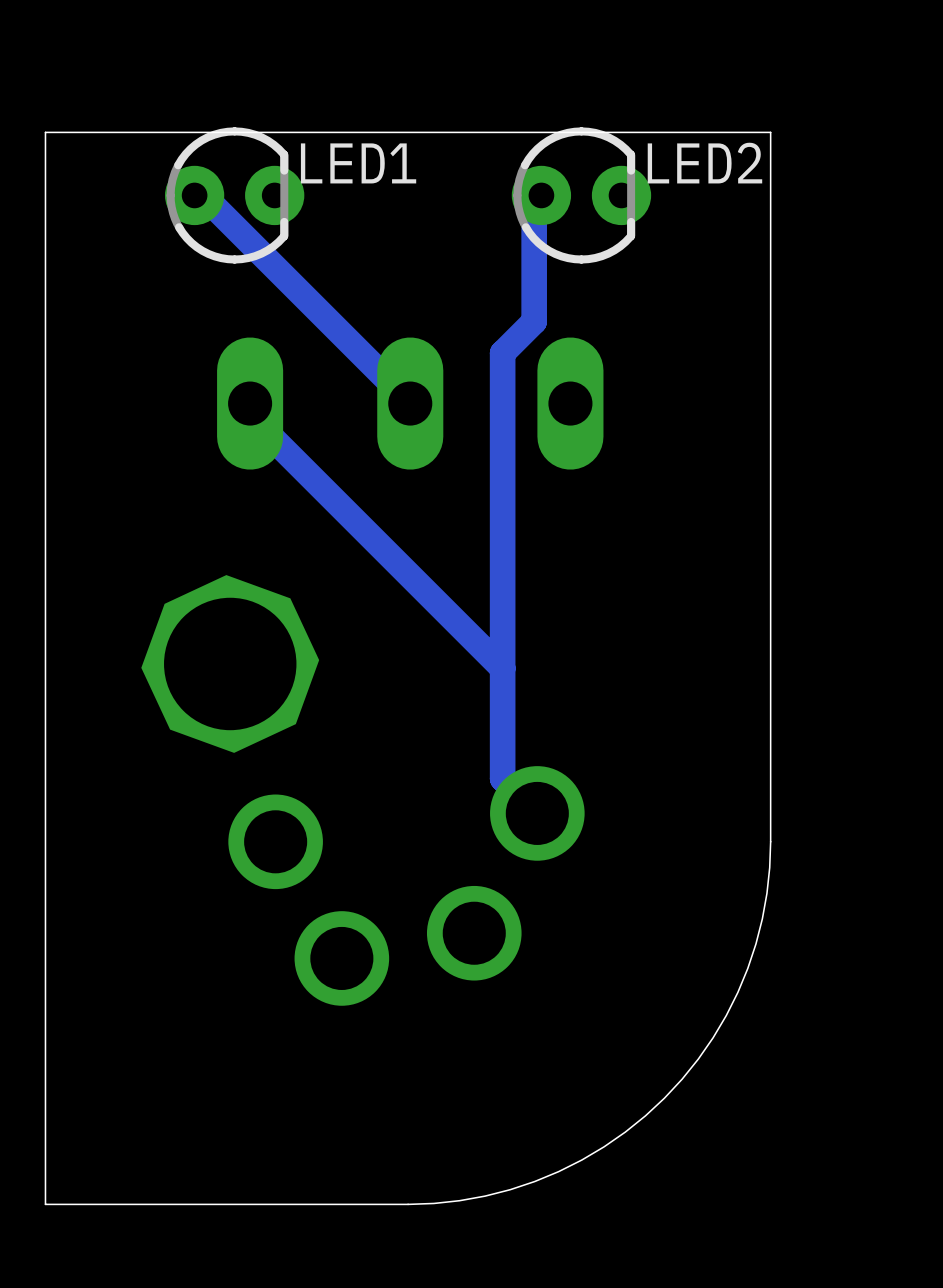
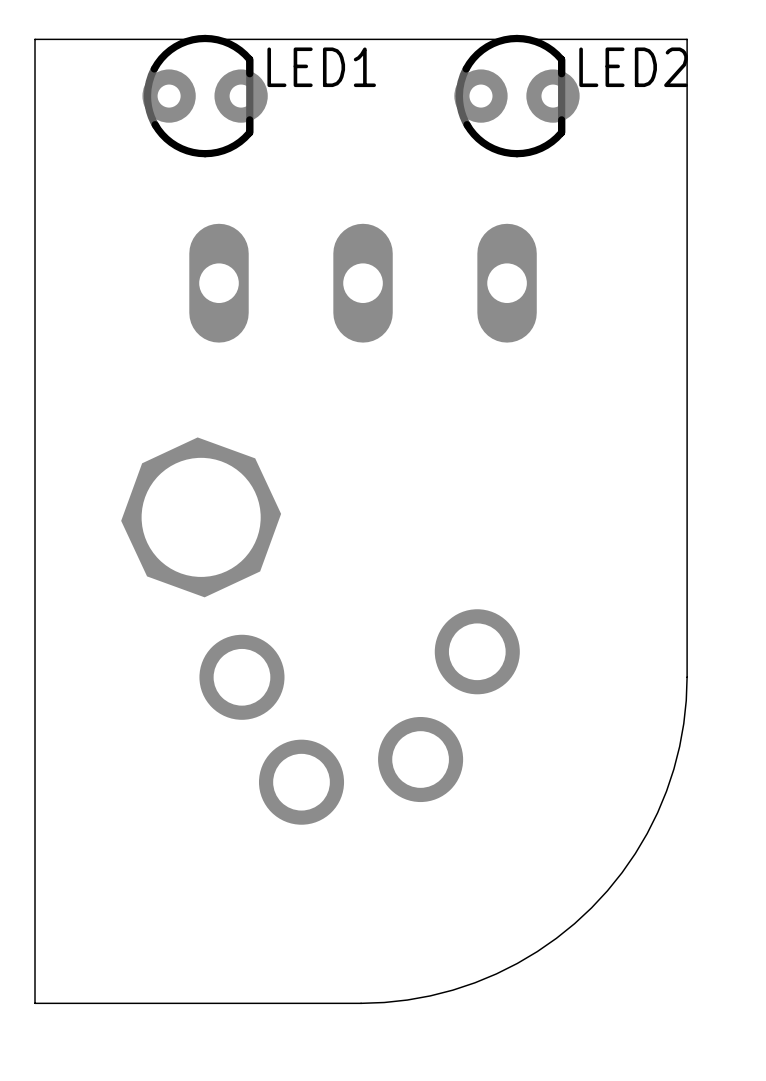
track: (194, 195) (203, 195) (410, 403) -> none
track: (541, 195) (534, 195) (534, 321) (502, 353) (502, 778) (537, 813) -> none
track: (250, 403) (250, 416) (502, 668) -> none

